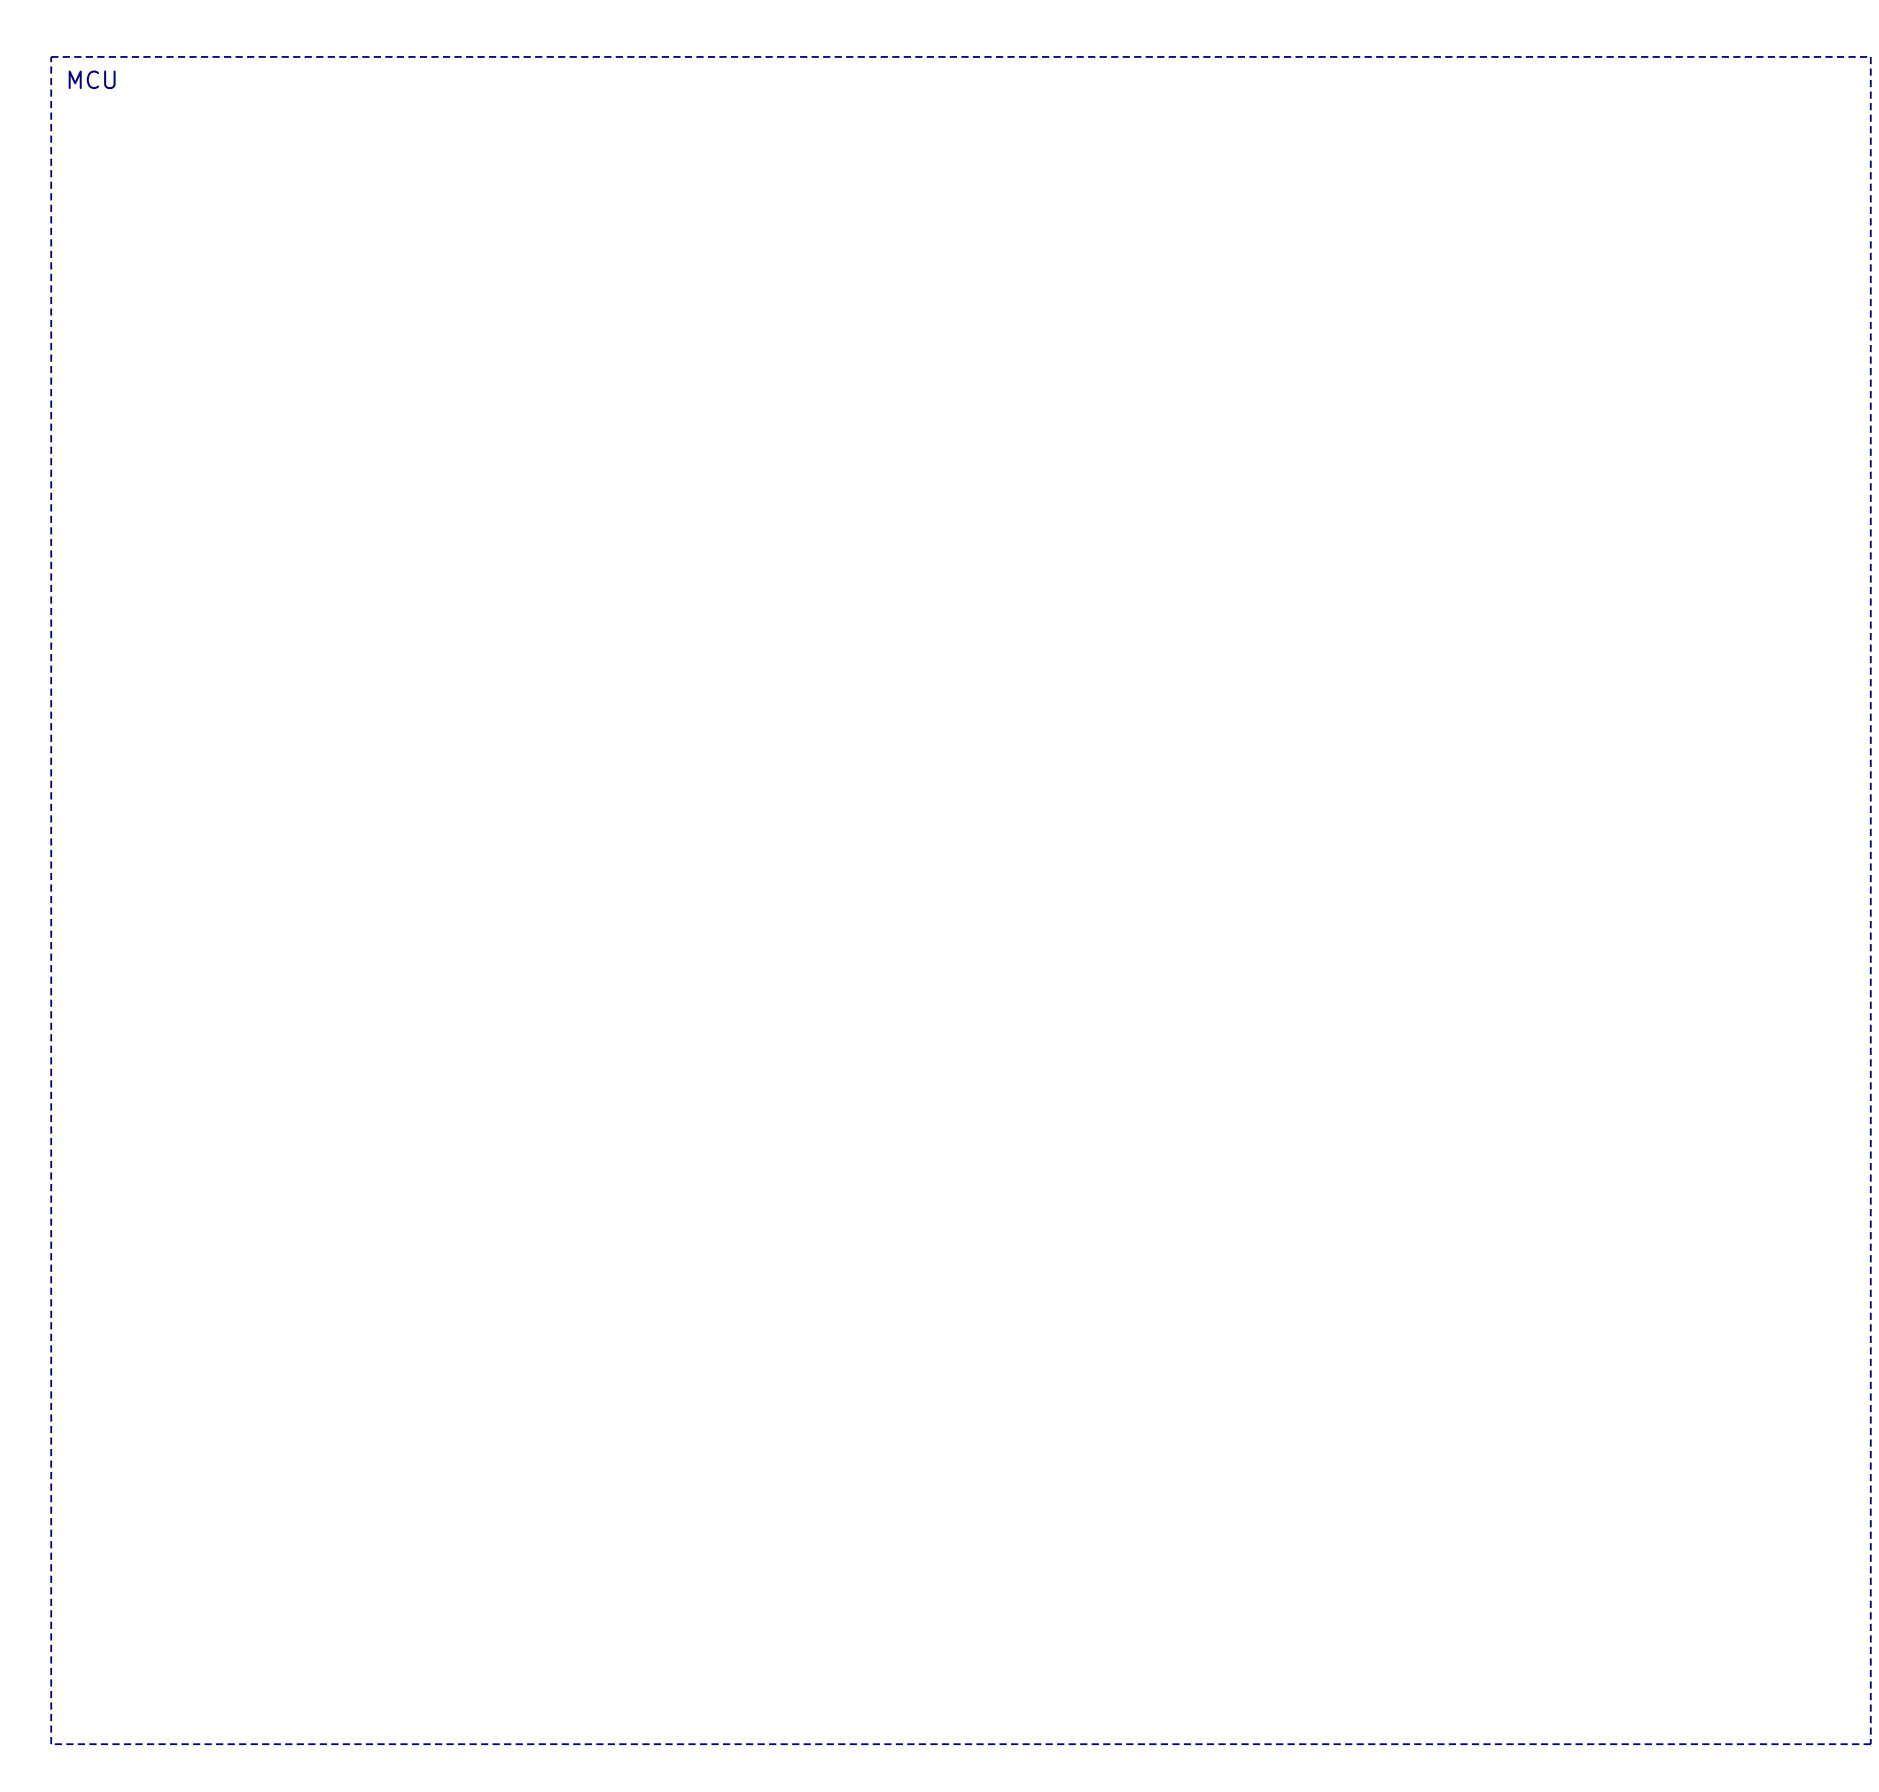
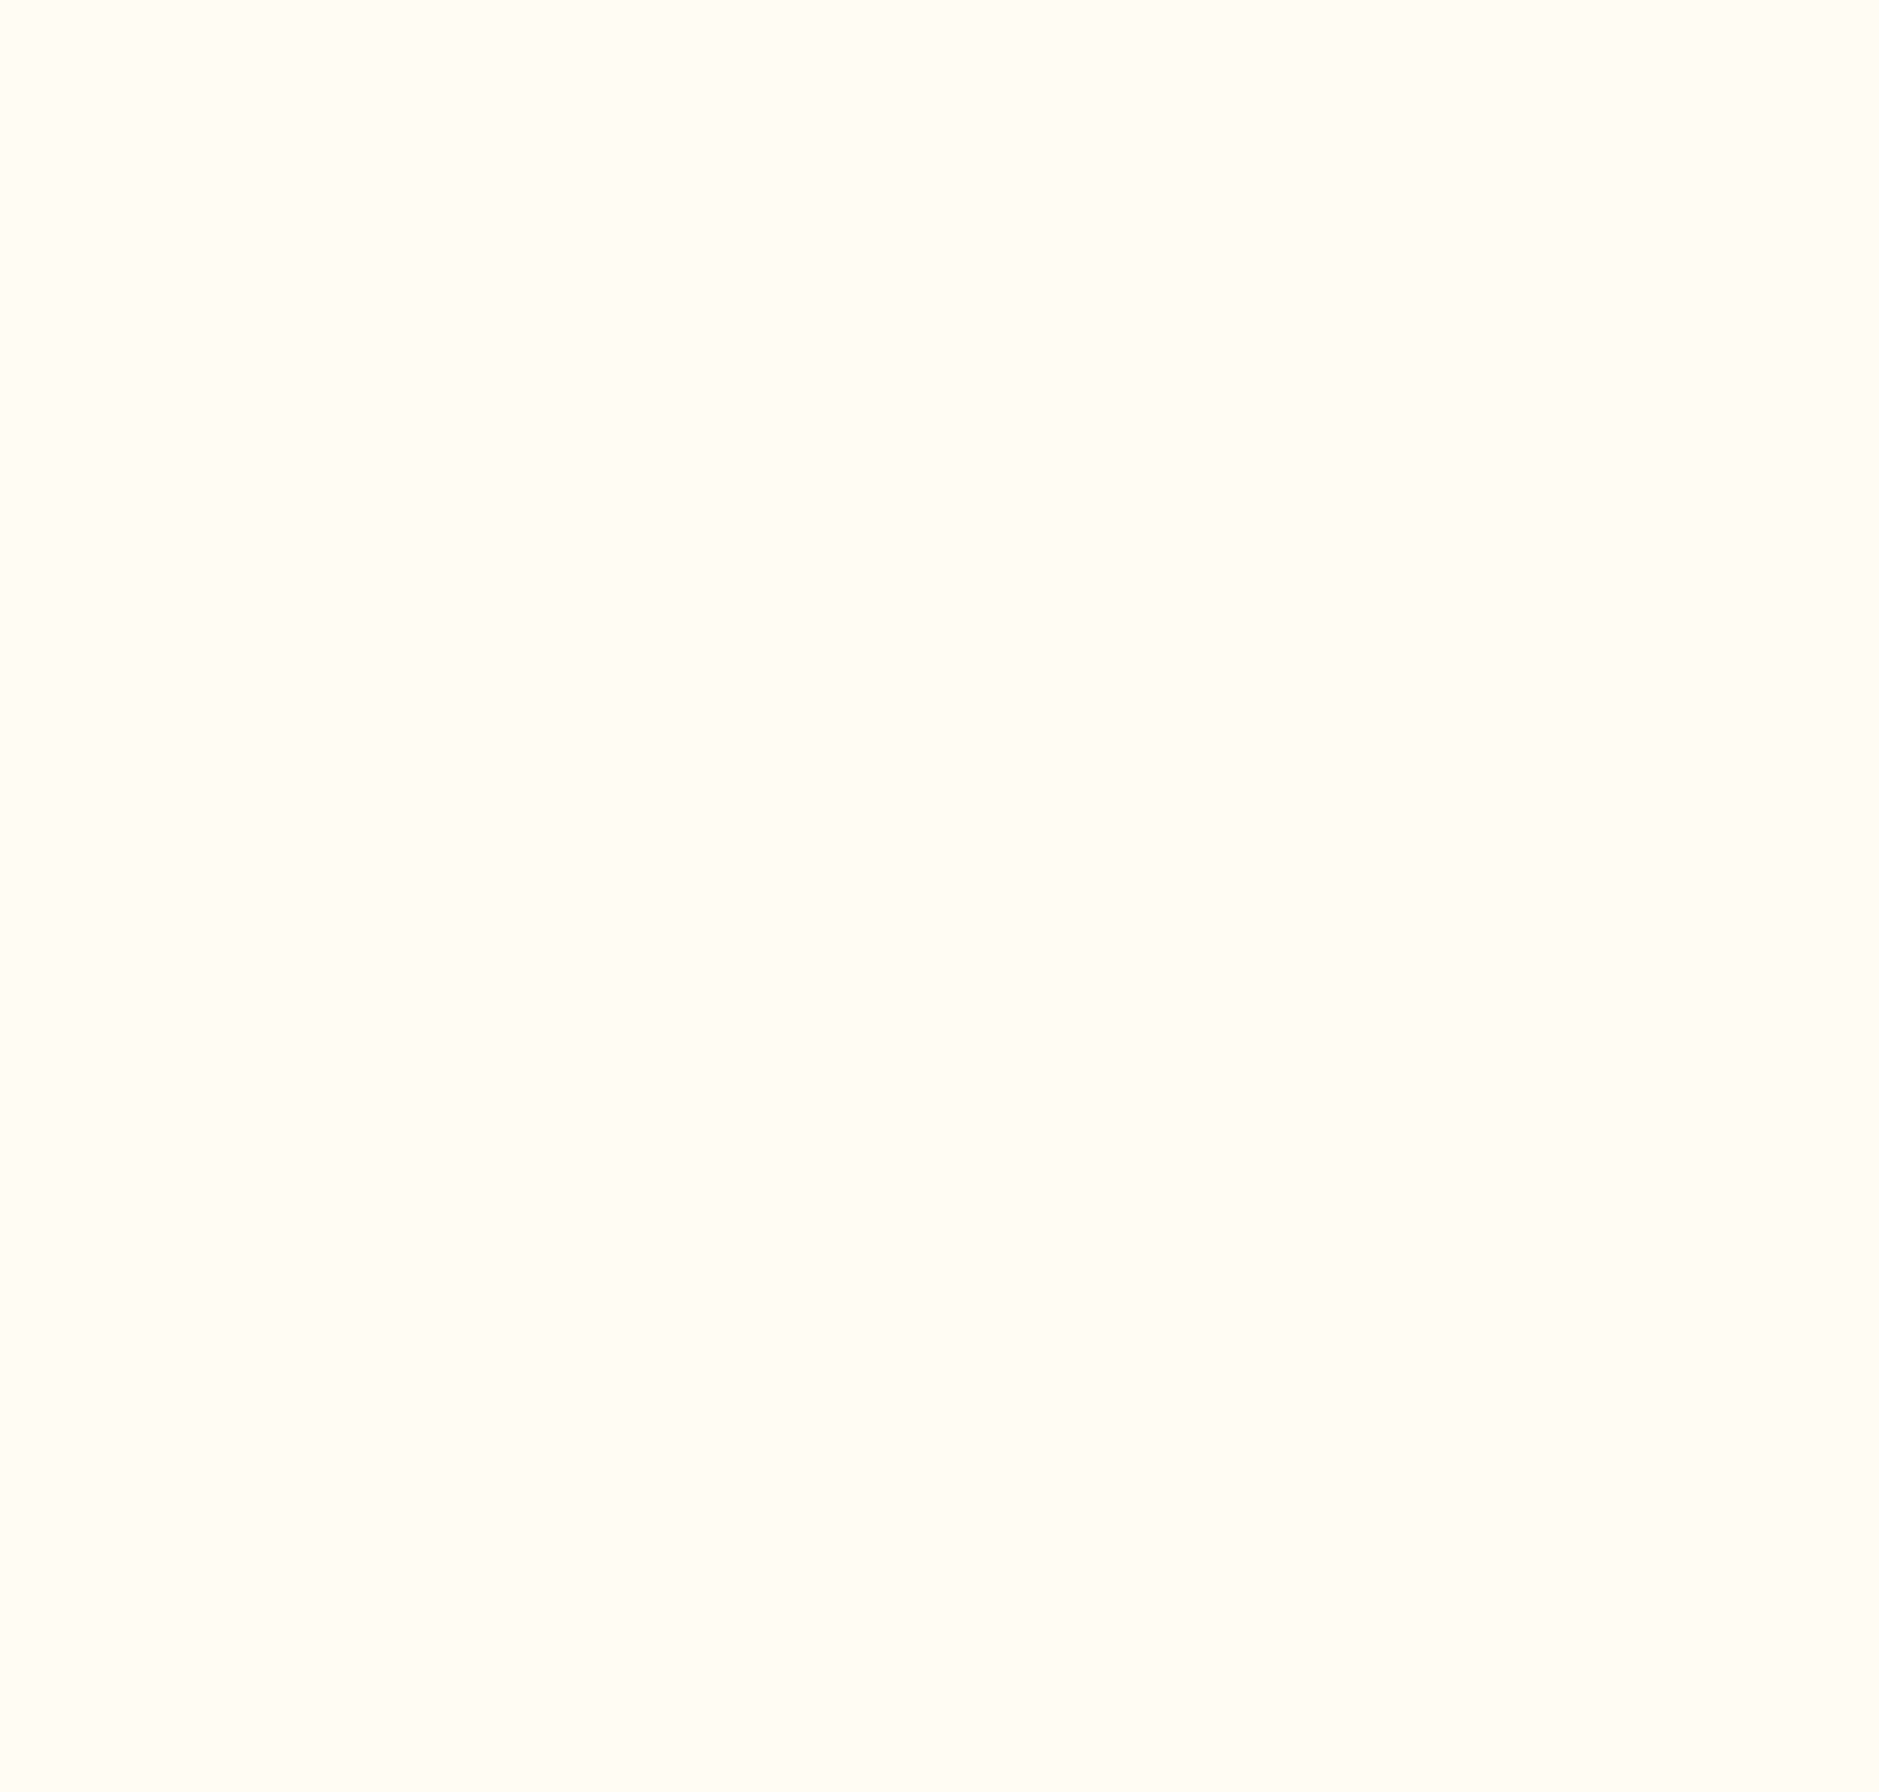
line: (51, 56) (1870, 56) (1870, 1744) (51, 1744) (51, 56) -> none
text: MCU (92, 79) -> none

